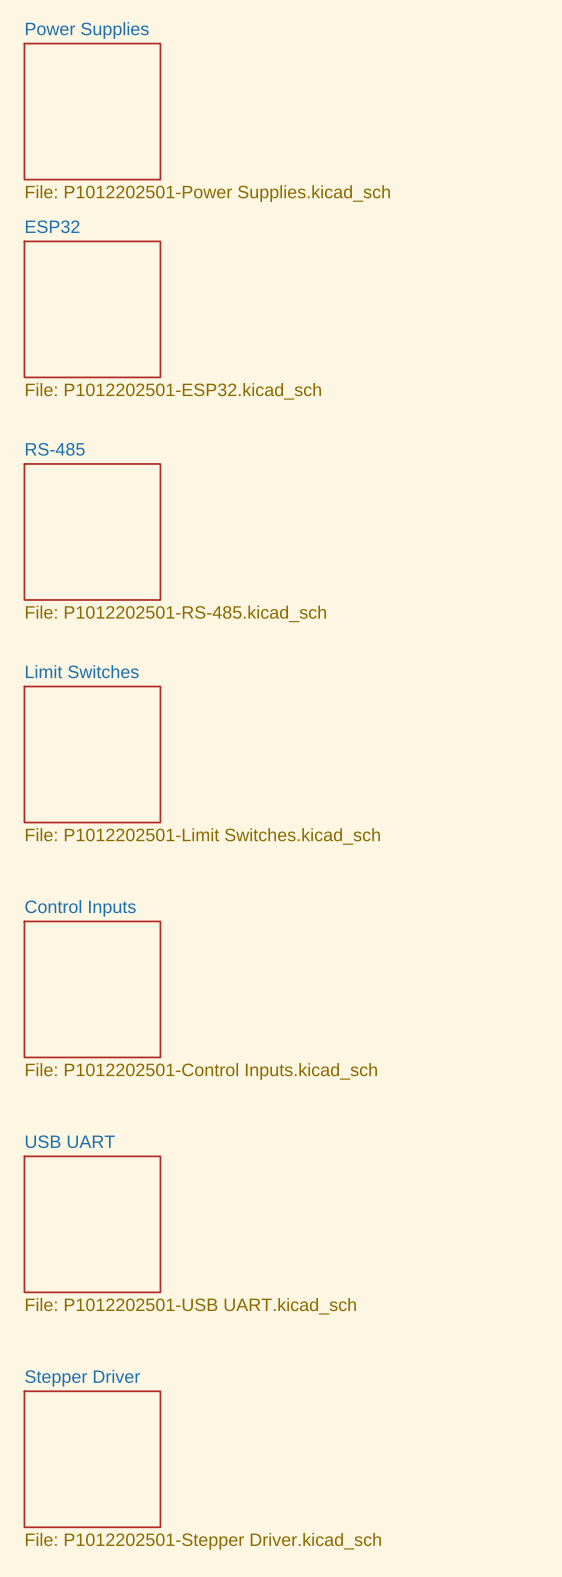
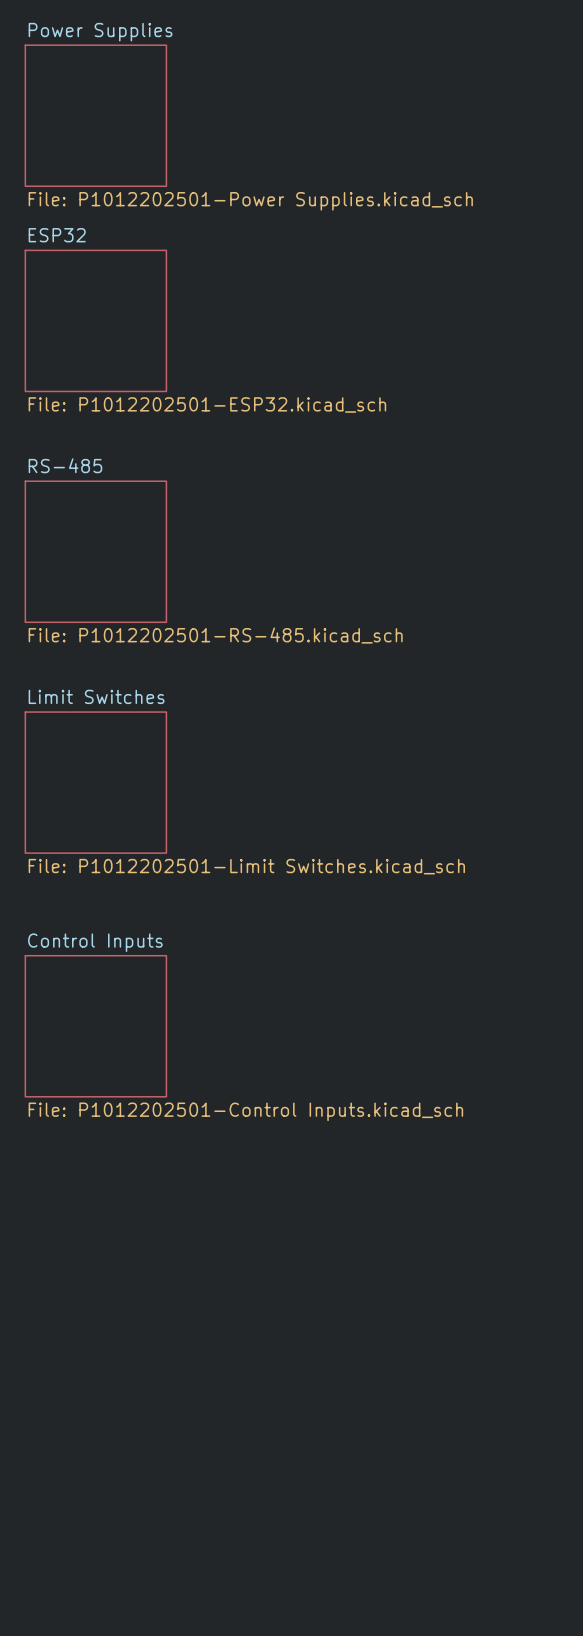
sheet USB UART: File: P1012202501-USB UART.kicad_sch (92, 1224) -> none
sheet Stepper Driver: File: P1012202501-Stepper Driver.kicad_sch (92, 1459) -> none

